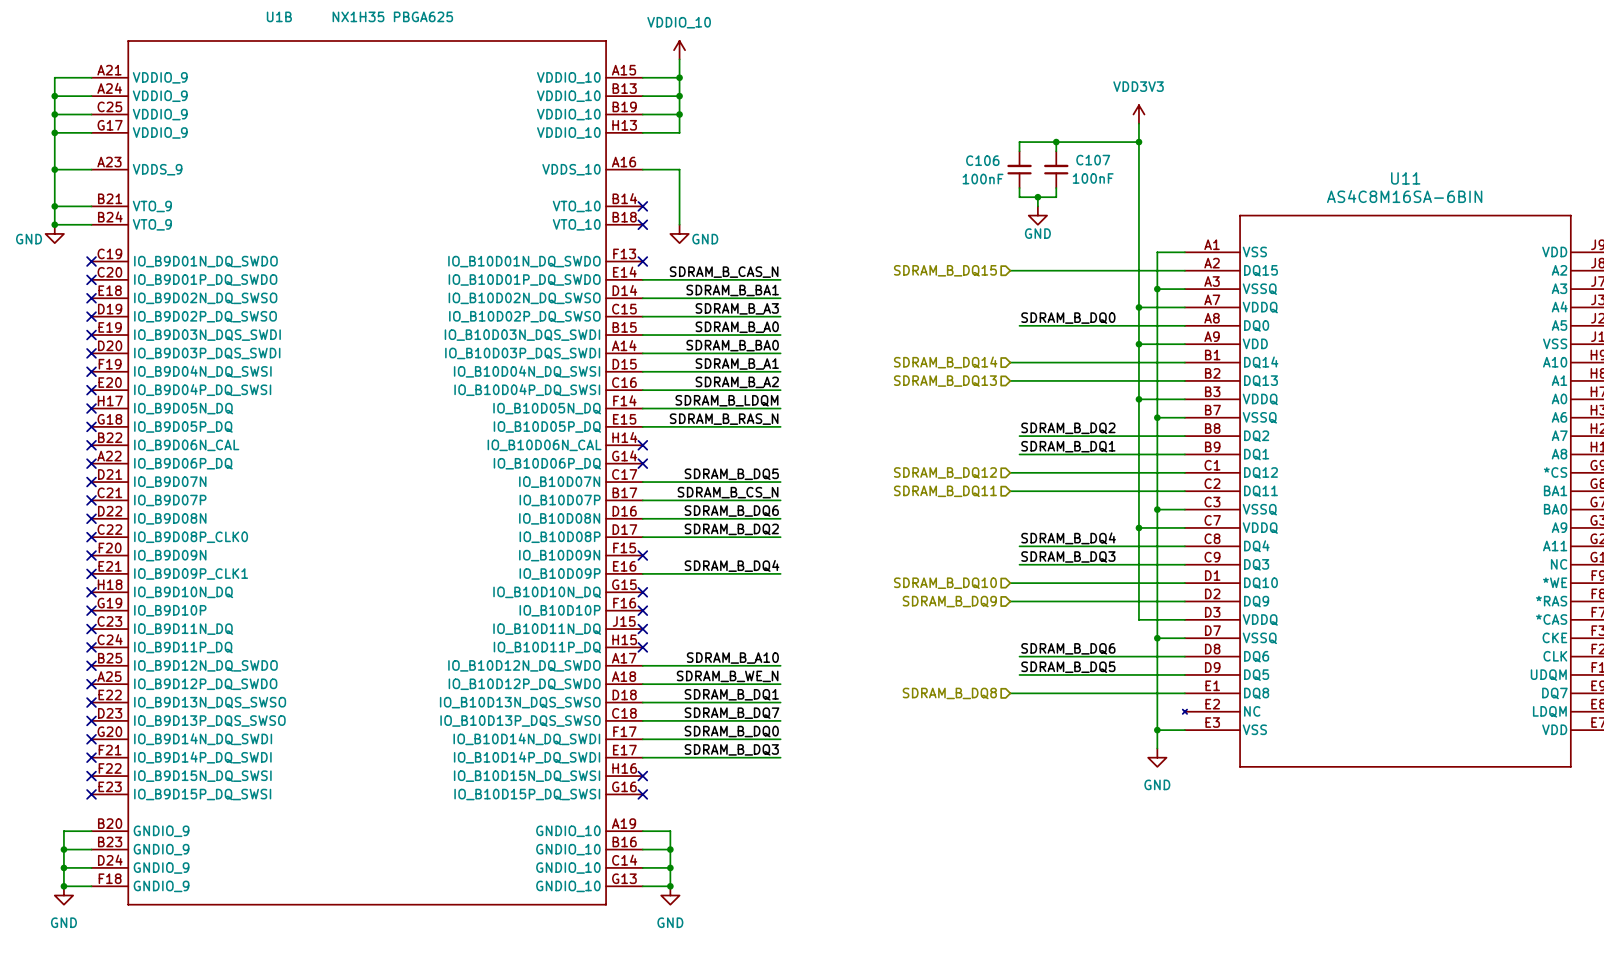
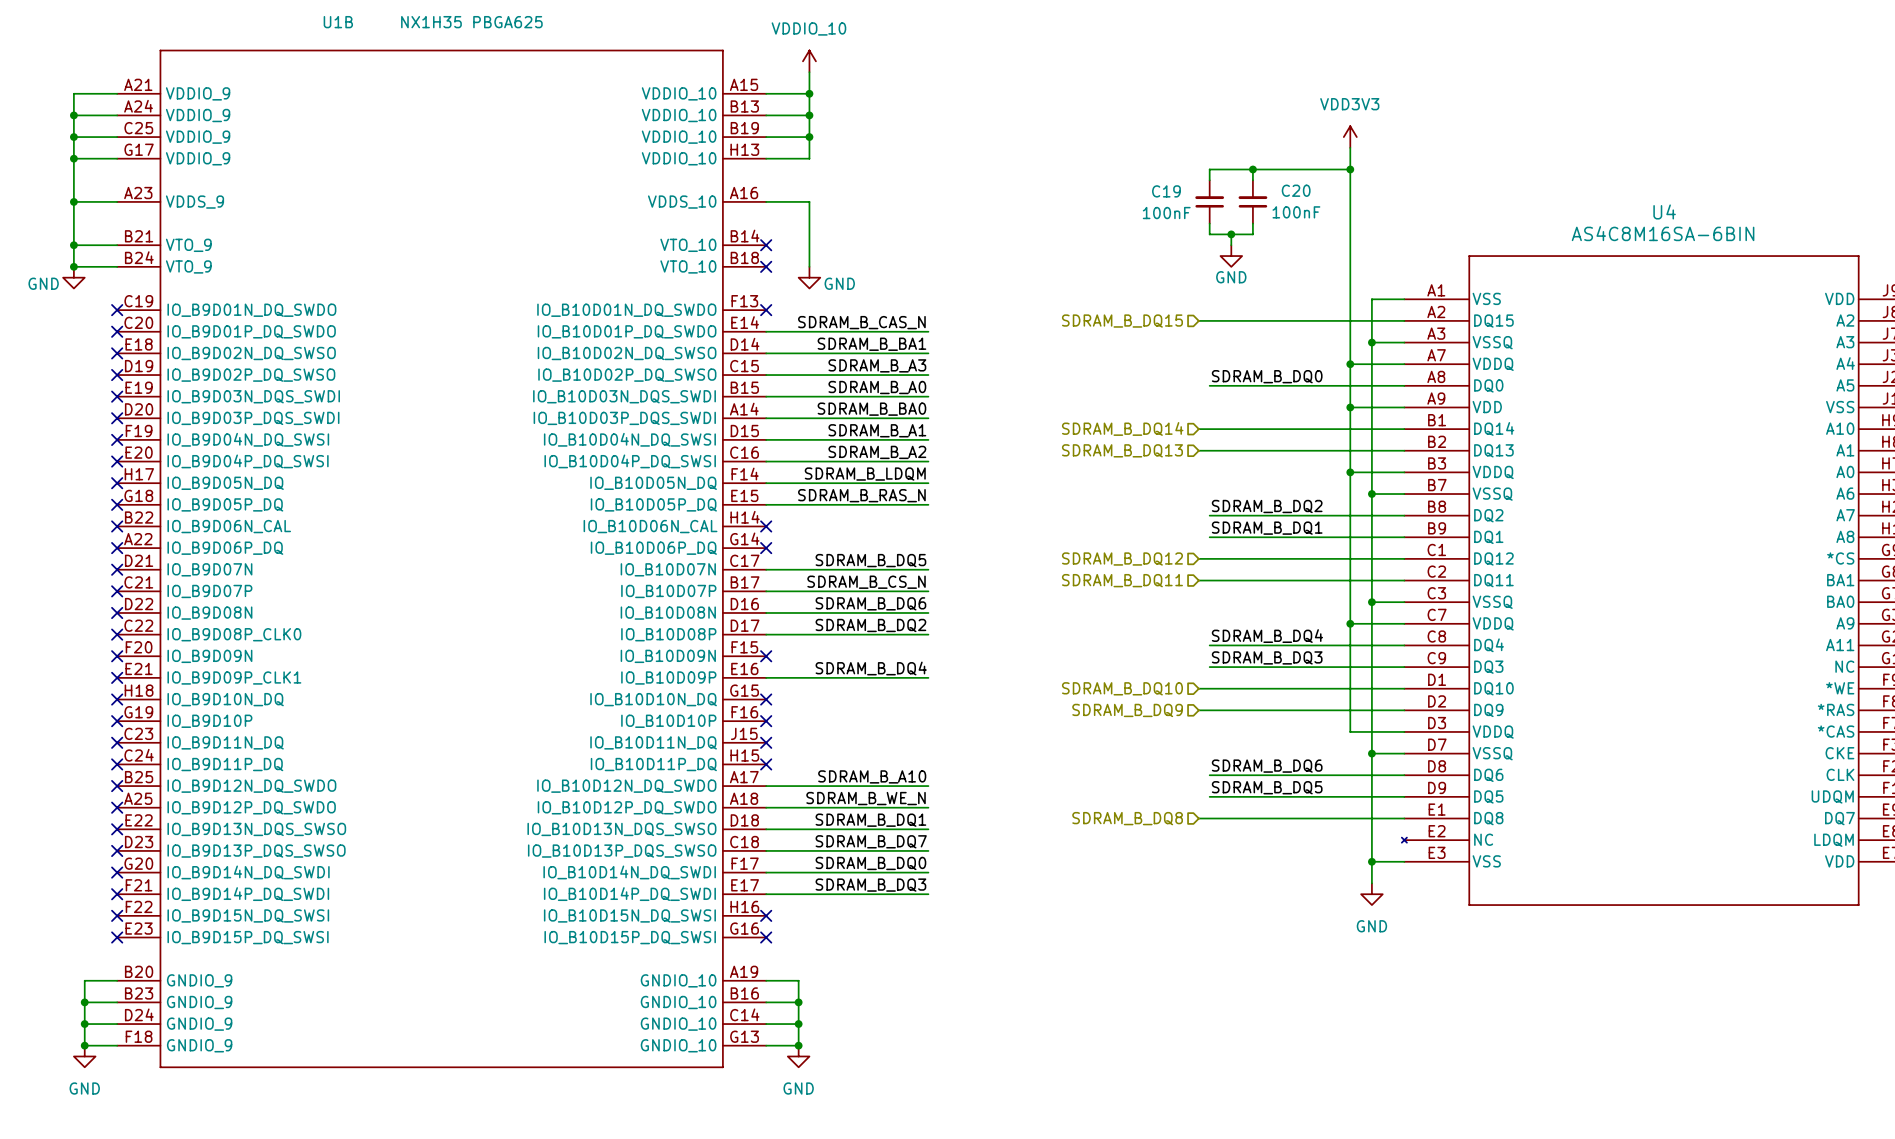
C106 name: C106 (982, 160) -> C19 (1166, 191)
C107 name: C107 (1093, 160) -> C20 (1296, 190)
U11 name: U11 (1405, 178) -> U4 (1664, 211)

